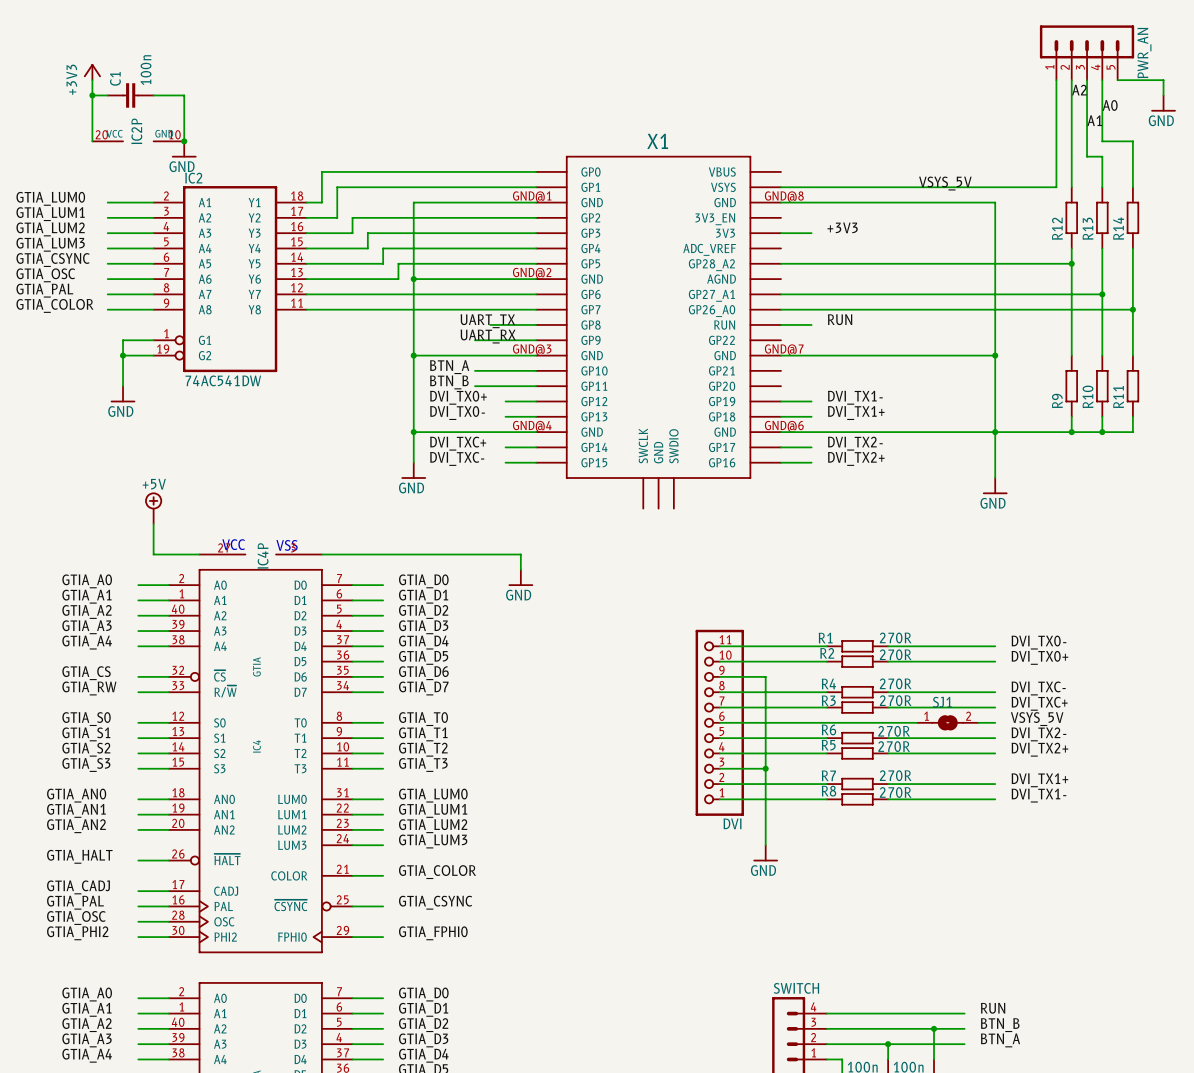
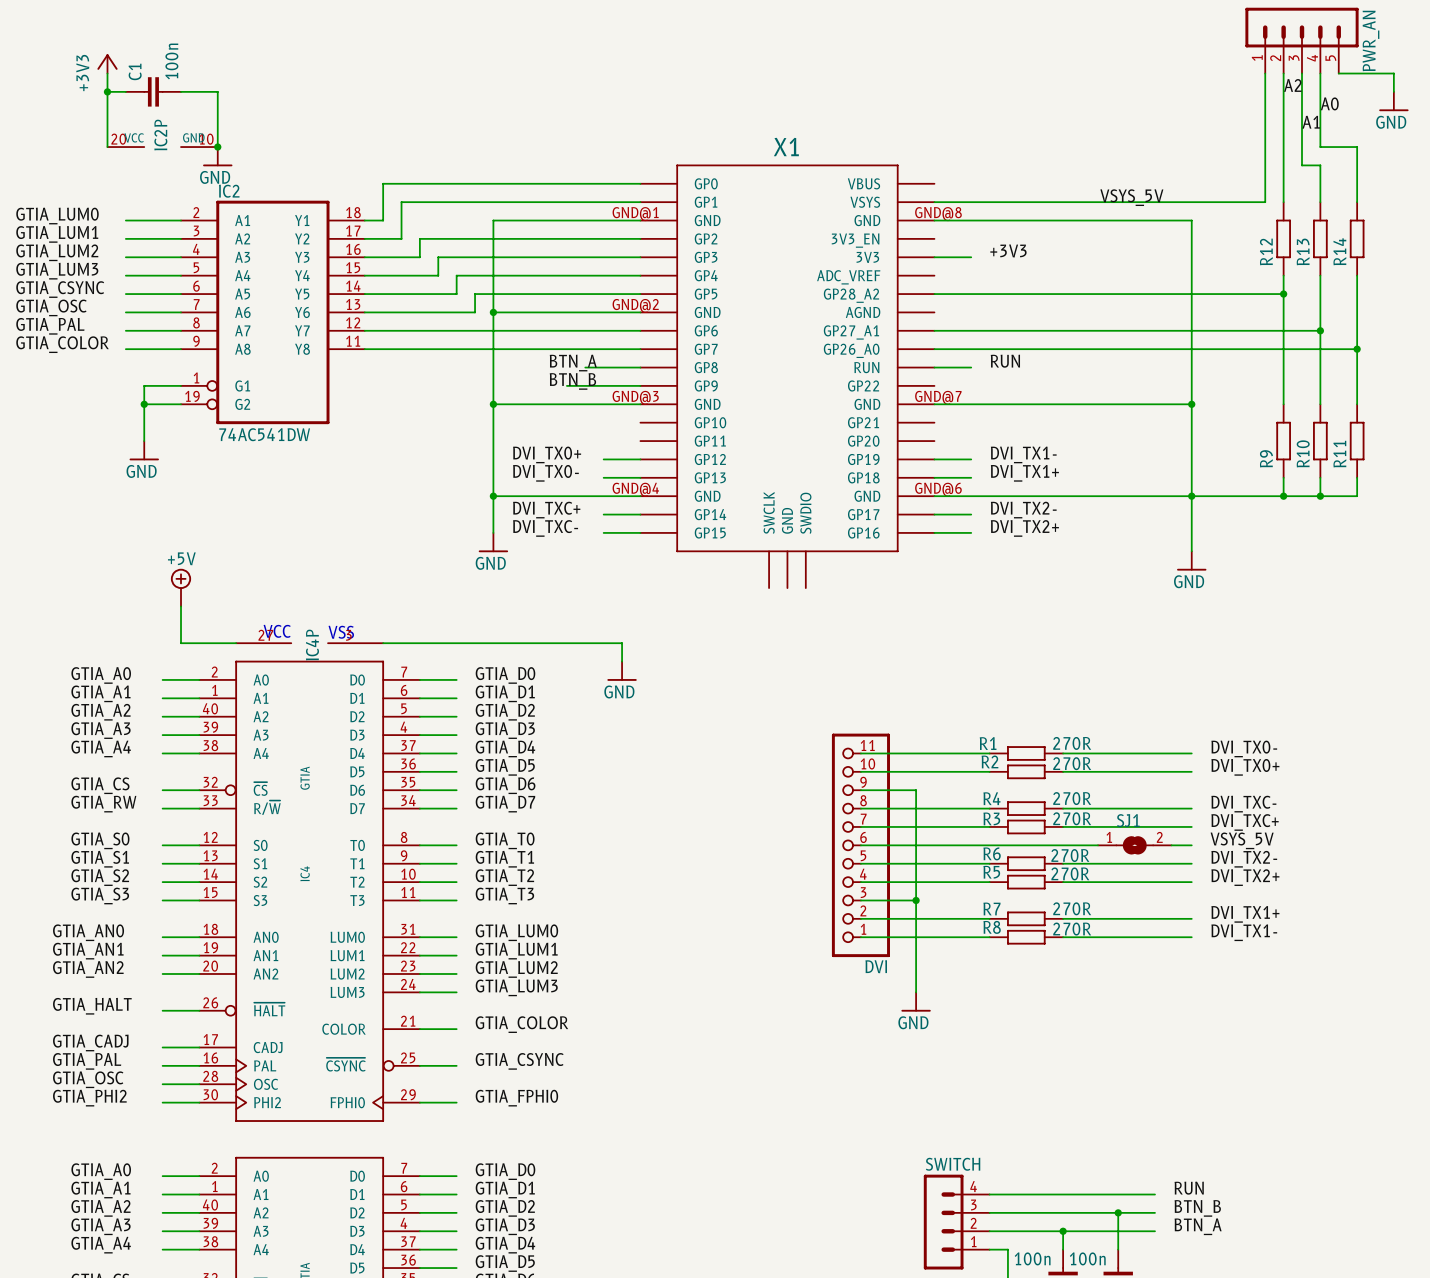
label: UART_TX (487, 321) -> BTN_A (573, 363)
label: UART_RX (488, 336) -> BTN_B (572, 381)
label: BTN_A (449, 367) -> none
wire: (474, 370) (536, 370) -> none
label: BTN_B (449, 382) -> none
wire: (474, 386) (536, 386) -> none

